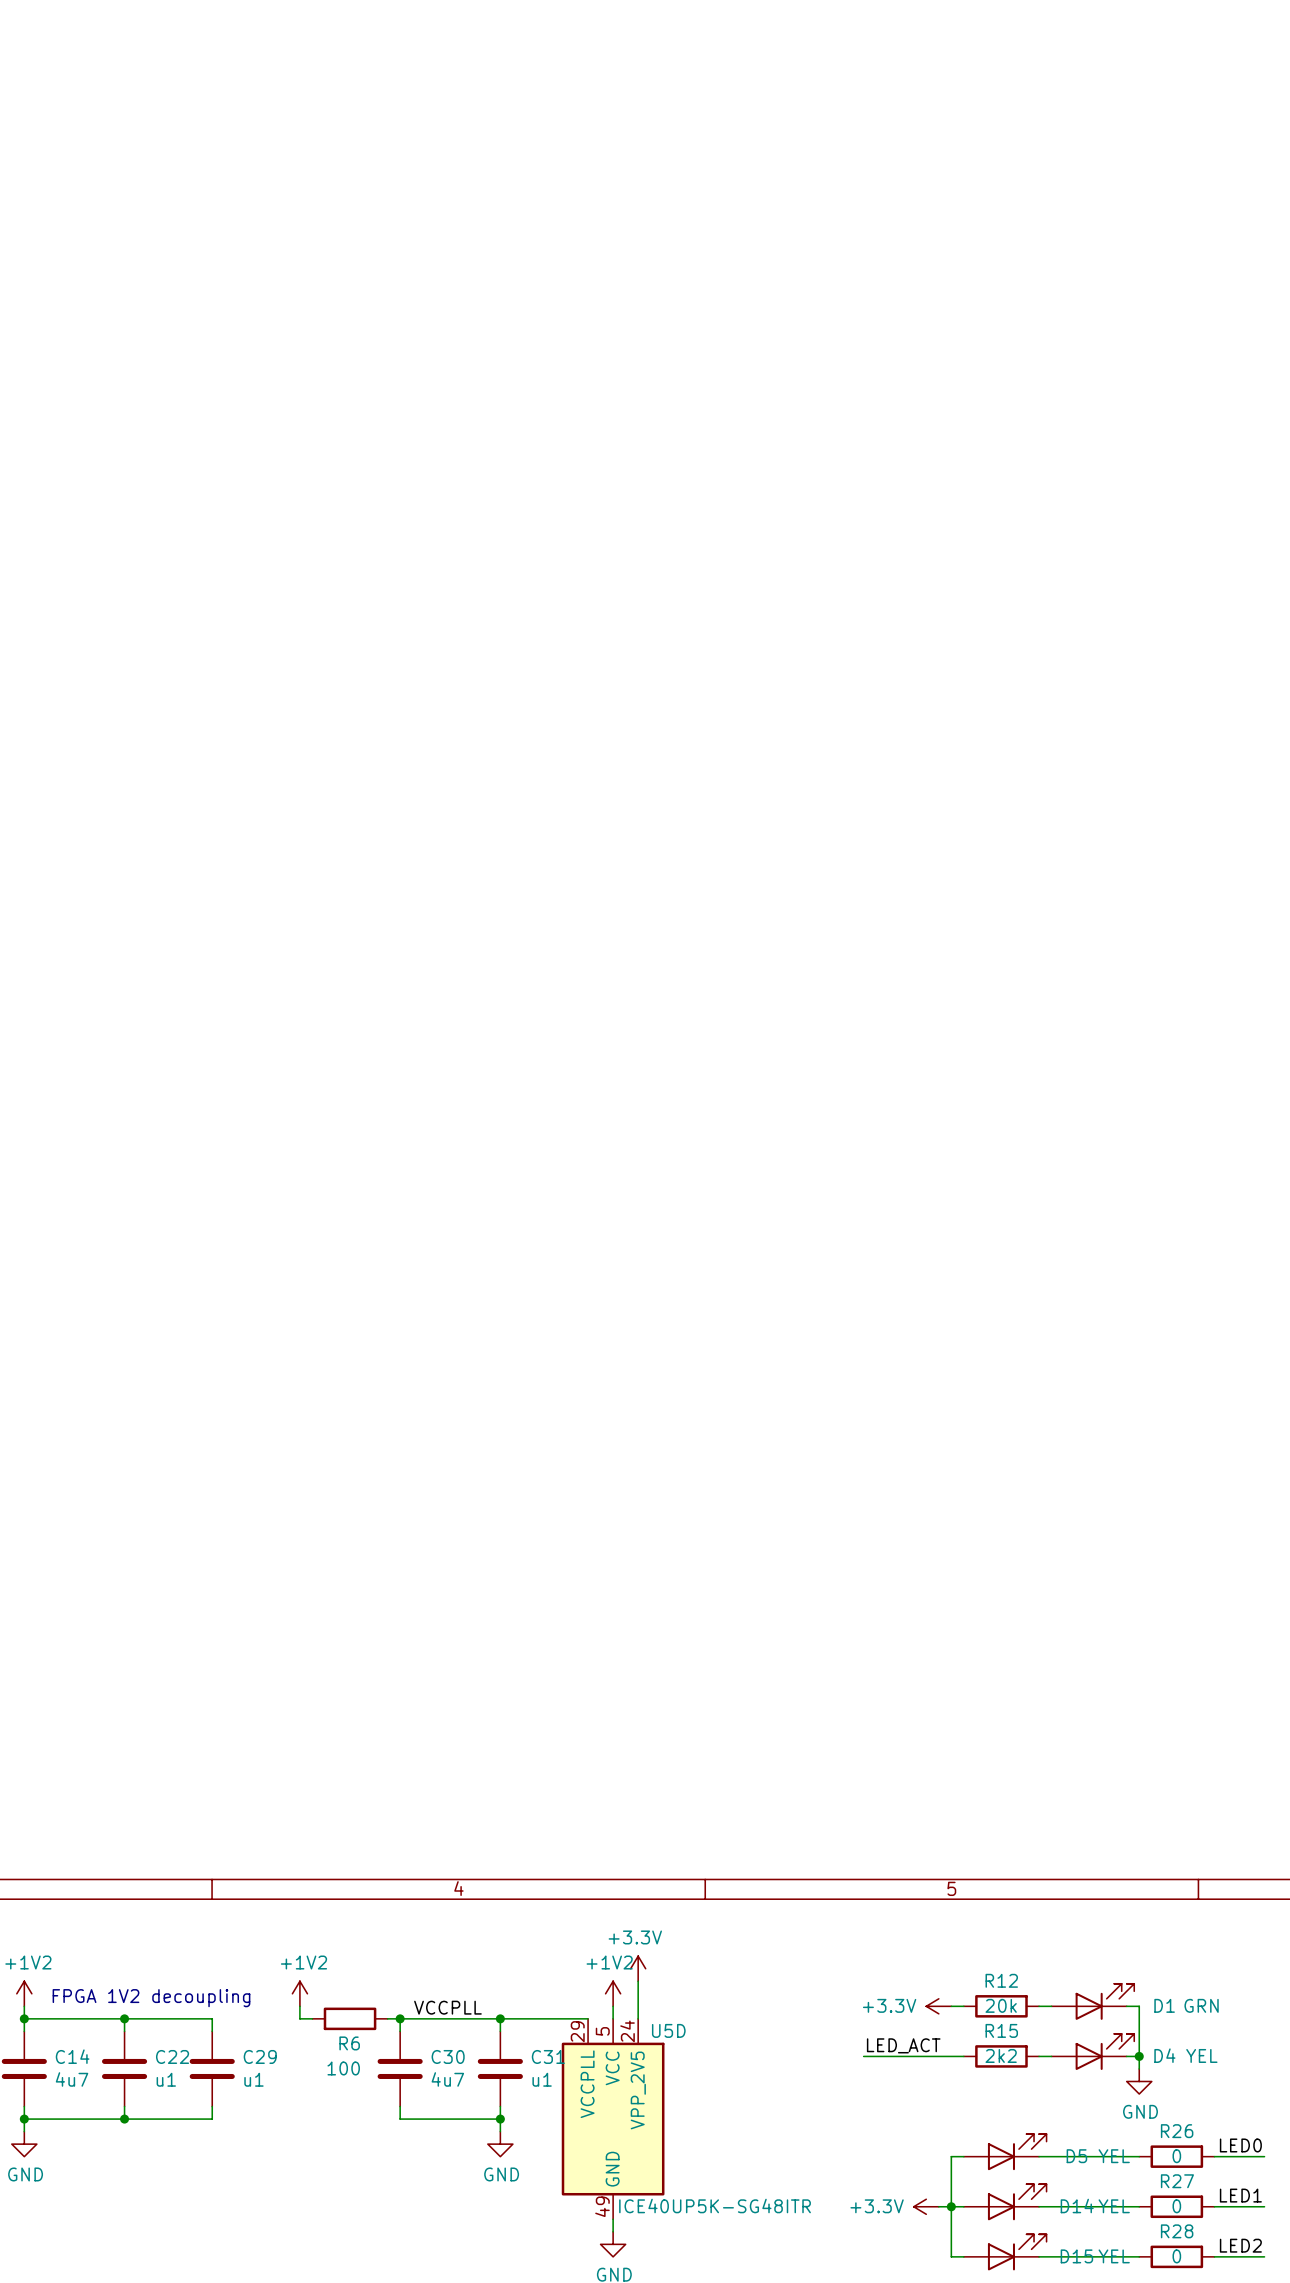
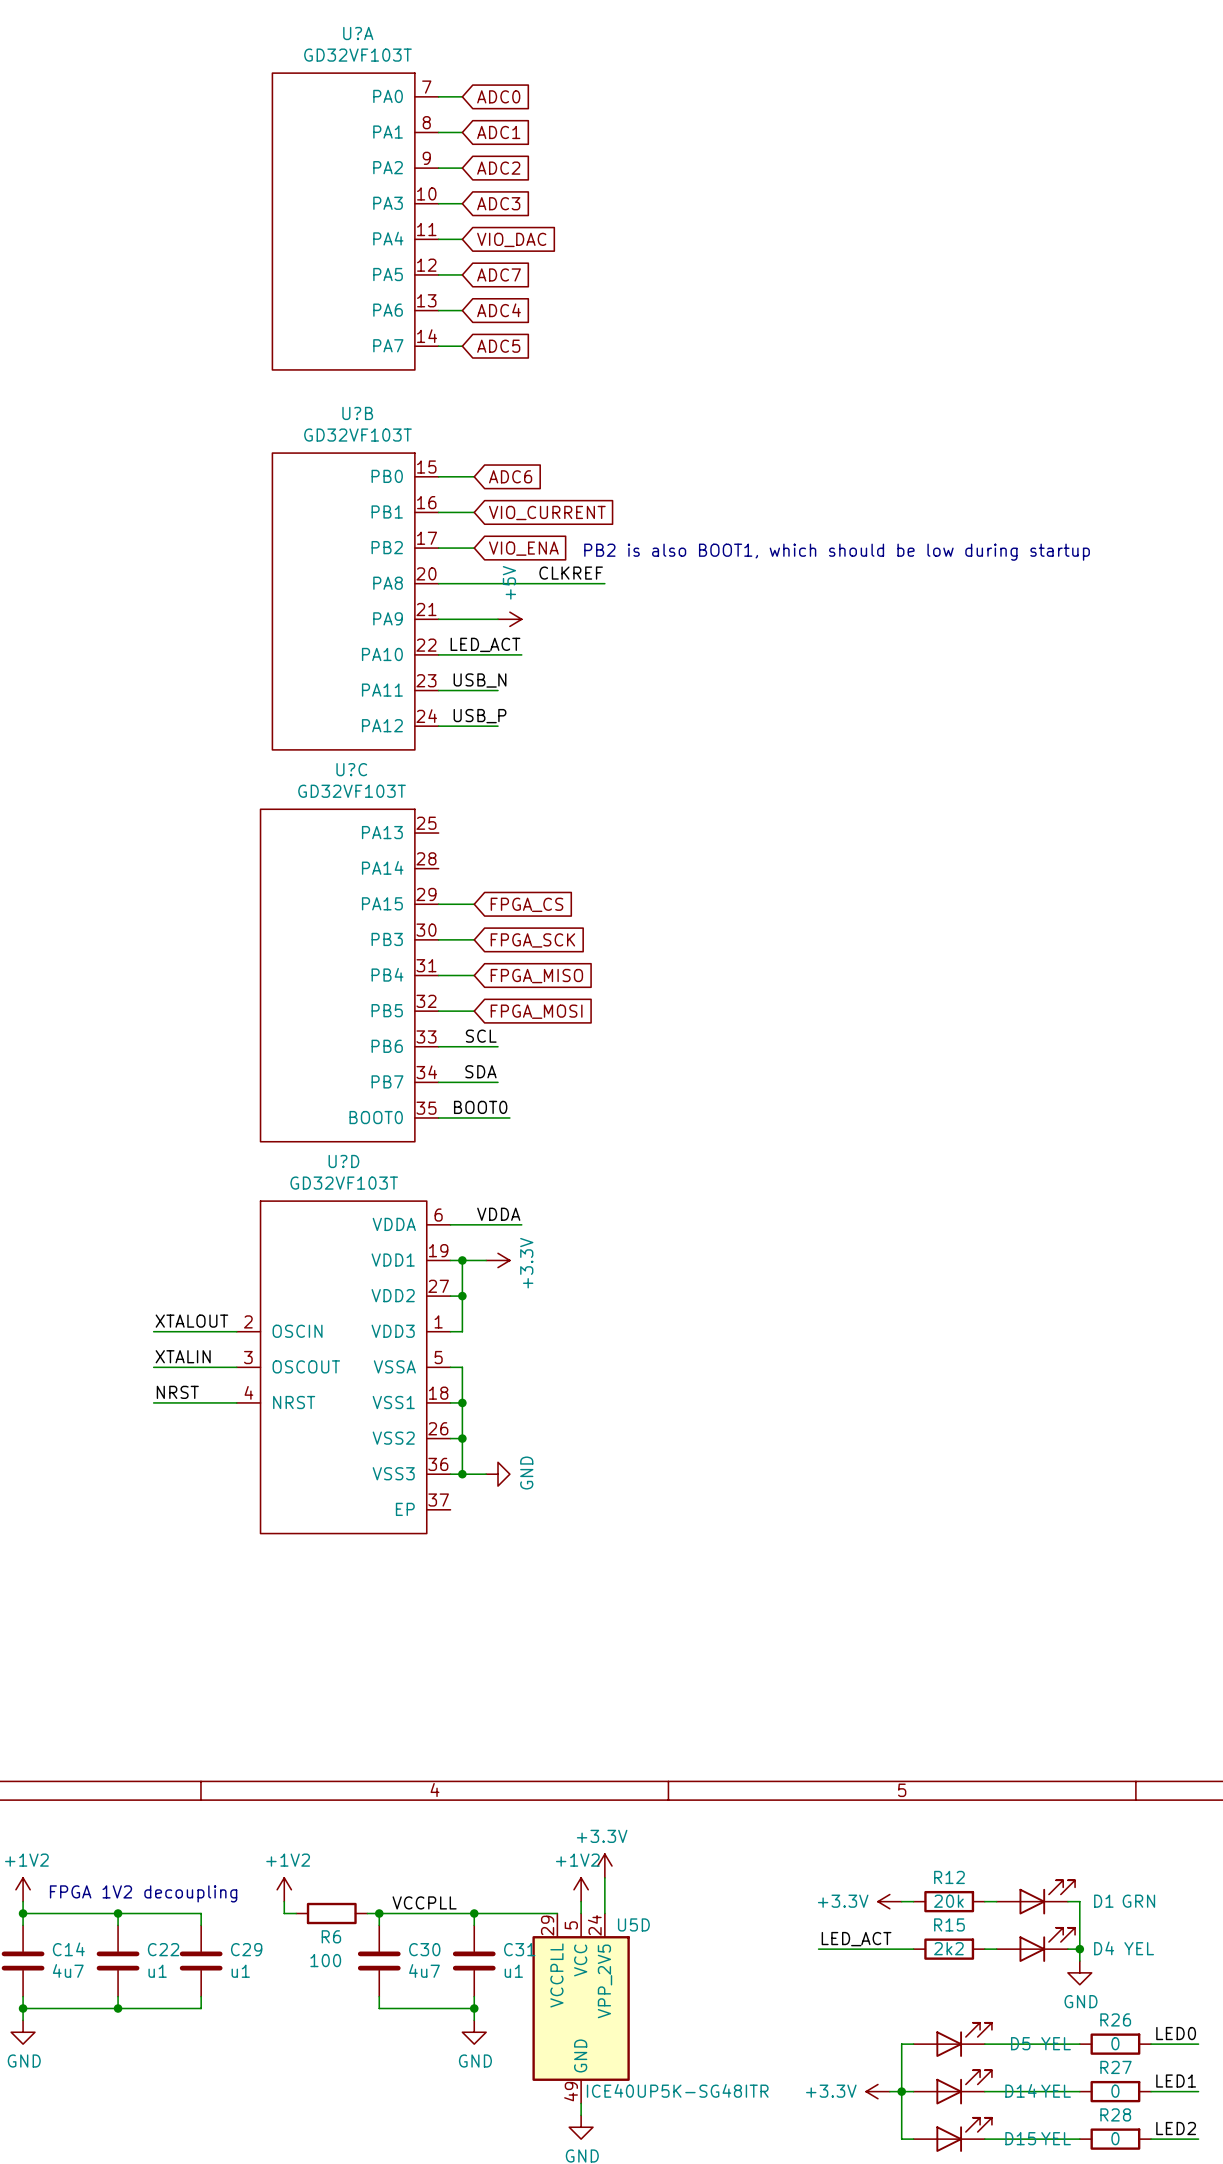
wire: none -> (438, 96) (462, 96)
global label: none -> ADC0 (498, 96)
wire: none -> (438, 132) (462, 132)
global label: none -> ADC1 (498, 132)
wire: none -> (438, 168) (462, 168)
global label: none -> ADC2 (498, 168)
wire: none -> (438, 203) (462, 203)
global label: none -> ADC3 (498, 203)
U?A: none -> GD32VF103T (355, 221)
wire: none -> (438, 239) (462, 239)
global label: none -> VIO_DAC (511, 239)
wire: none -> (438, 274) (462, 274)
global label: none -> ADC7 (499, 274)
wire: none -> (438, 310) (462, 310)
global label: none -> ADC4 (499, 310)
wire: none -> (438, 346) (462, 346)
global label: none -> ADC5 (498, 346)
wire: none -> (438, 476) (474, 476)
global label: none -> ADC6 (510, 476)
wire: none -> (438, 512) (474, 512)
global label: none -> VIO_CURRENT (547, 513)
wire: none -> (438, 548) (474, 548)
global label: none -> VIO_ENA (523, 548)
text: none -> PB2 is also BOOT1, which should be low during startup (837, 552)
label: none -> CLKREF (571, 573)
wire: none -> (438, 583) (604, 583)
U?B: none -> GD32VF103T (355, 601)
wire: none -> (438, 619) (498, 619)
power symbol: none -> +5V (509, 619)
label: none -> LED_ACT (485, 644)
wire: none -> (438, 654) (521, 654)
label: none -> USB_N (480, 680)
wire: none -> (438, 690) (498, 690)
label: none -> USB_P (480, 716)
wire: none -> (438, 726) (498, 726)
wire: none -> (438, 904) (474, 904)
global label: none -> FPGA_CS (527, 904)
wire: none -> (438, 939) (474, 939)
global label: none -> FPGA_SCK (532, 940)
U?C: none -> GD32VF103T (349, 975)
wire: none -> (438, 975) (474, 975)
global label: none -> FPGA_MISO (536, 976)
wire: none -> (438, 1011) (474, 1011)
global label: none -> FPGA_MOSI (536, 1011)
label: none -> SCL (481, 1036)
wire: none -> (438, 1046) (498, 1046)
label: none -> SDA (480, 1071)
wire: none -> (438, 1082) (498, 1082)
label: none -> BOOT0 (480, 1107)
wire: none -> (438, 1117) (509, 1117)
label: none -> VDDA (498, 1214)
wire: none -> (450, 1224) (521, 1224)
wire: none -> (450, 1260) (486, 1260)
wire: none -> (462, 1260) (462, 1331) (450, 1331)
junction: none -> (462, 1260)
power symbol: none -> +3.3V (498, 1260)
wire: none -> (450, 1296) (462, 1296)
junction: none -> (462, 1296)
label: none -> XTALOUT (191, 1321)
wire: none -> (153, 1331) (236, 1331)
label: none -> XTALIN (183, 1356)
wire: none -> (153, 1367) (236, 1367)
U?D: none -> GD32VF103T (343, 1367)
wire: none -> (450, 1367) (462, 1367) (462, 1474)
label: none -> NRST (177, 1392)
wire: none -> (153, 1402) (236, 1402)
wire: none -> (450, 1402) (462, 1402)
junction: none -> (462, 1402)
wire: none -> (450, 1438) (462, 1438)
junction: none -> (462, 1438)
wire: none -> (450, 1474) (486, 1474)
junction: none -> (462, 1474)
power symbol: none -> GND (498, 1474)

